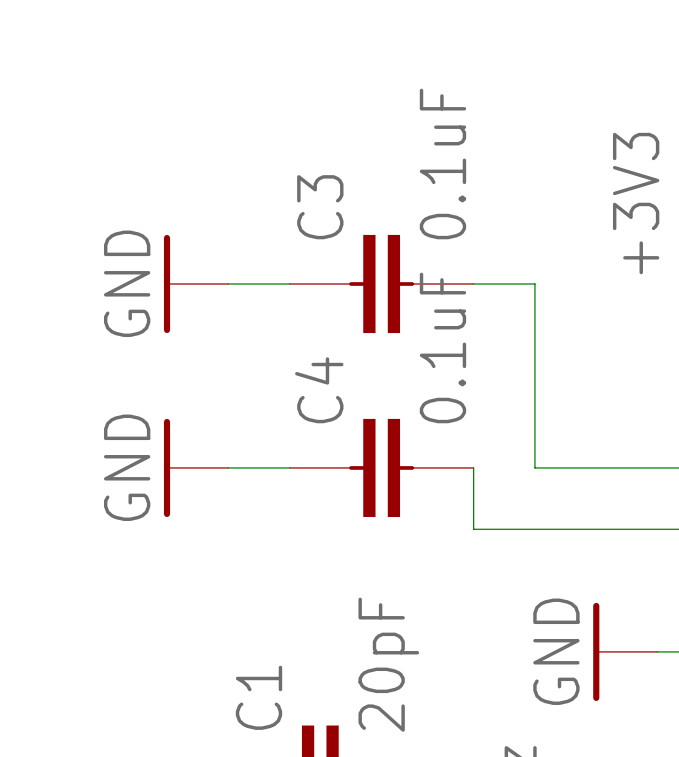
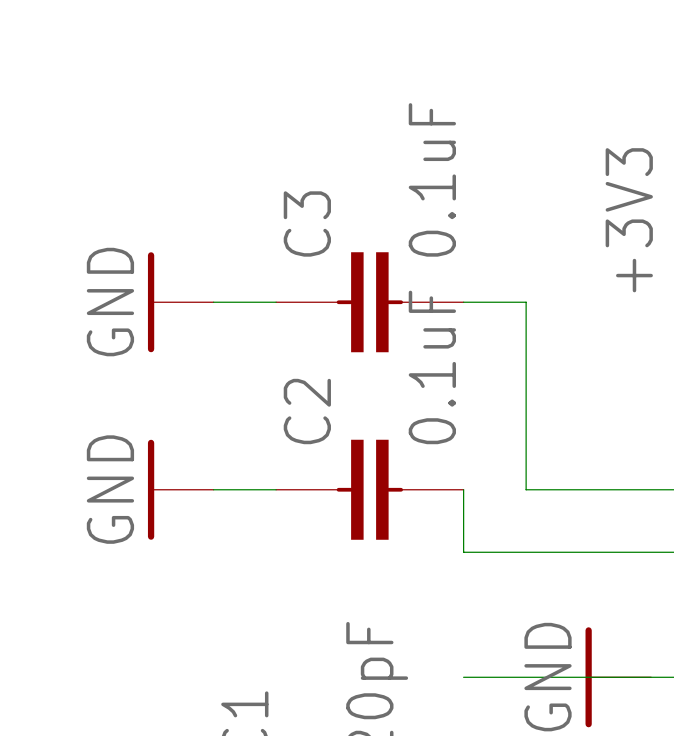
C4 name: C4 (319, 390) -> C2 (307, 411)
wire: none -> (463, 677) (651, 677)

